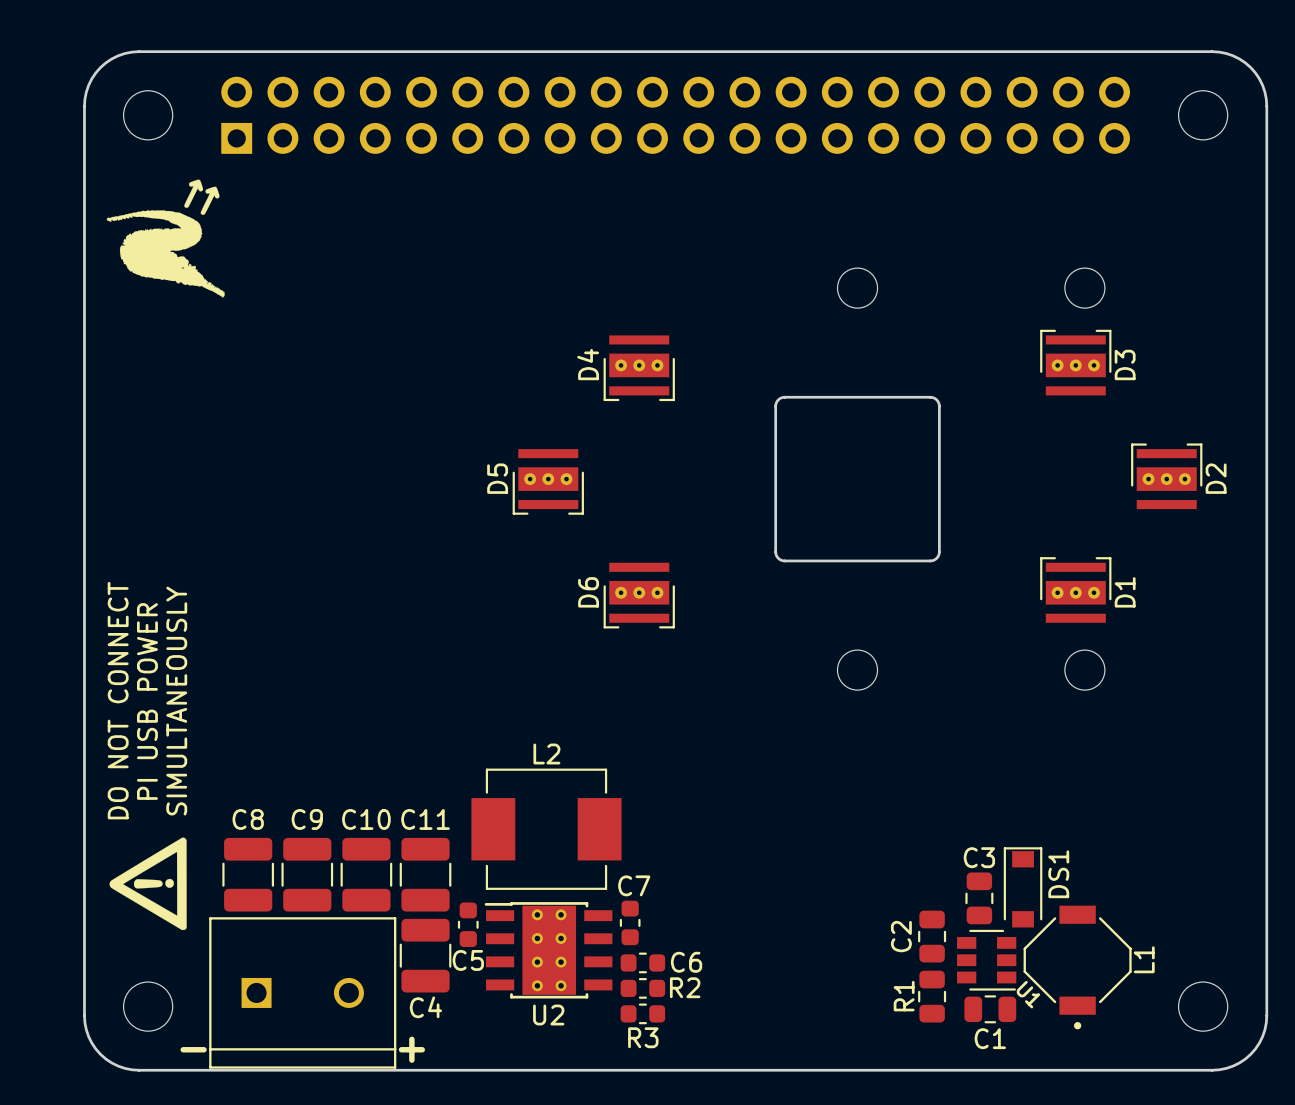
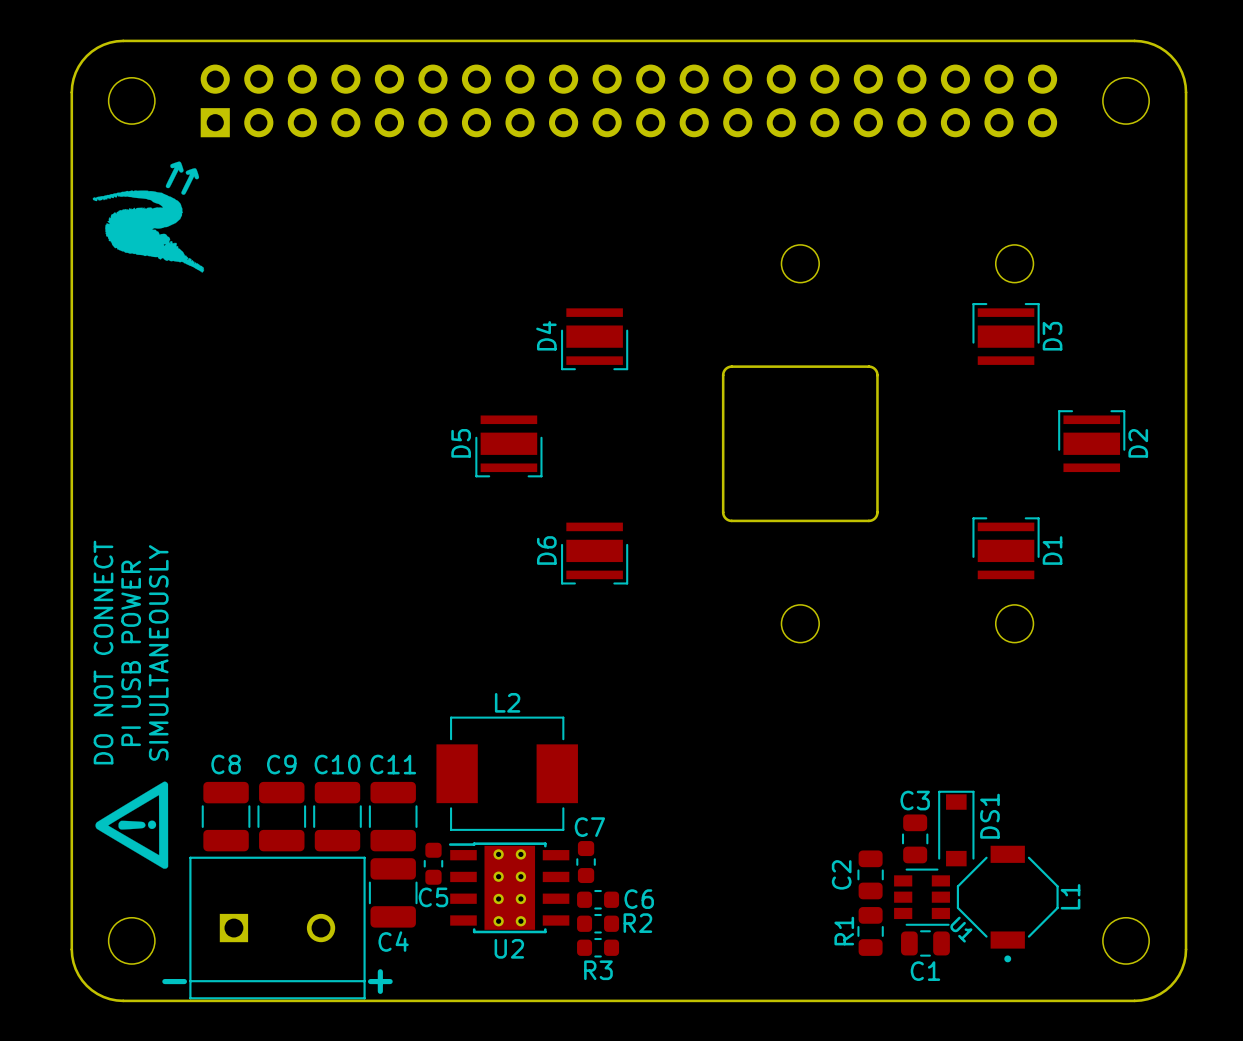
D3 footprint: [1040, 329, 1112, 396] -> [972, 303, 1040, 365]
D4 footprint: [603, 335, 675, 402] -> [561, 308, 629, 371]
D2 footprint: [1131, 443, 1203, 510] -> [1058, 410, 1126, 473]
D5 footprint: [512, 449, 584, 515] -> [475, 415, 543, 478]
D1 footprint: [1040, 557, 1112, 623] -> [972, 517, 1040, 580]
D6 footprint: [603, 562, 675, 629] -> [561, 522, 629, 585]

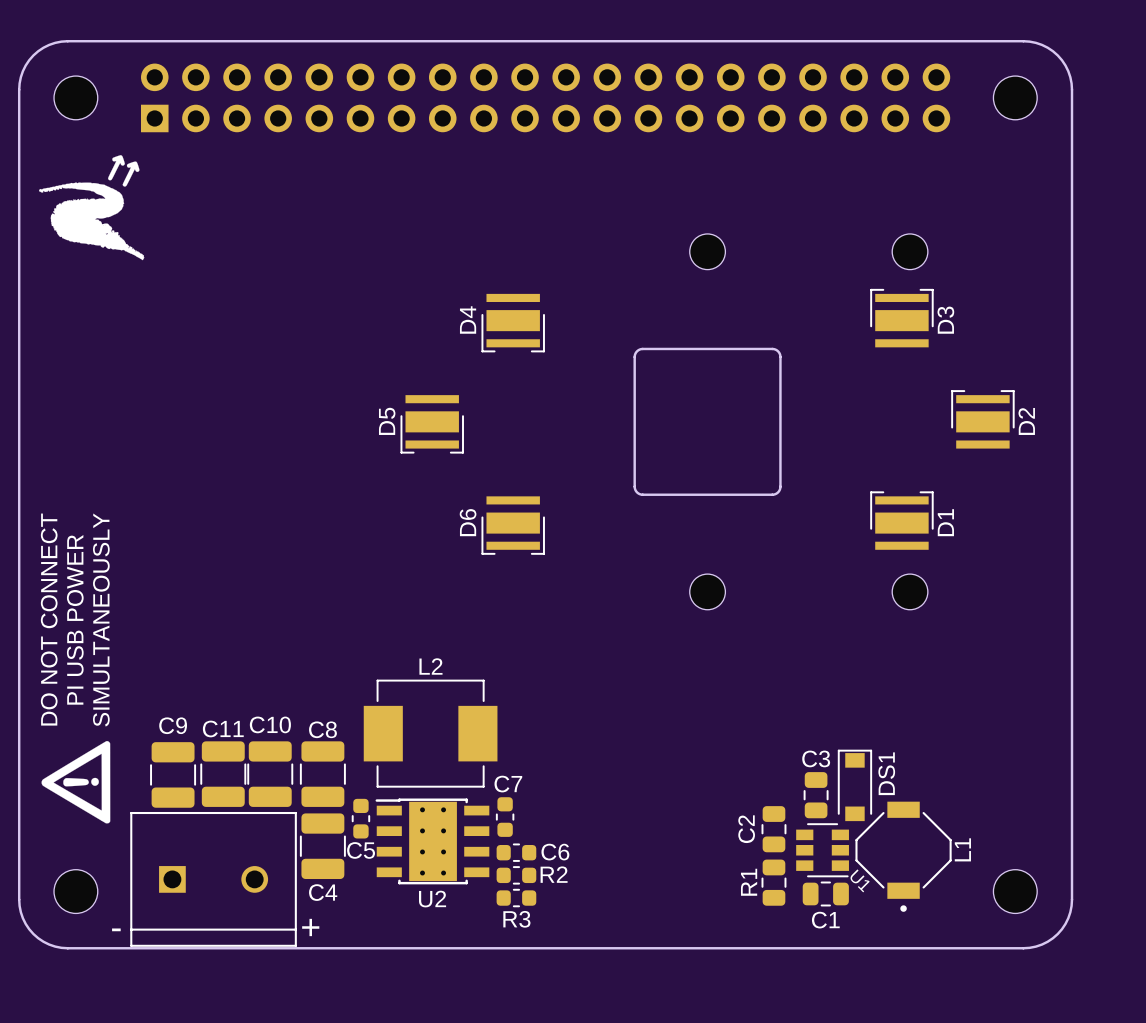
C11 name: C11 (393, 764) -> C8 (322, 729)
C8: (226, 816) -> none
C9 position: (281, 816) -> (173, 774)
C11: none -> (223, 774)

